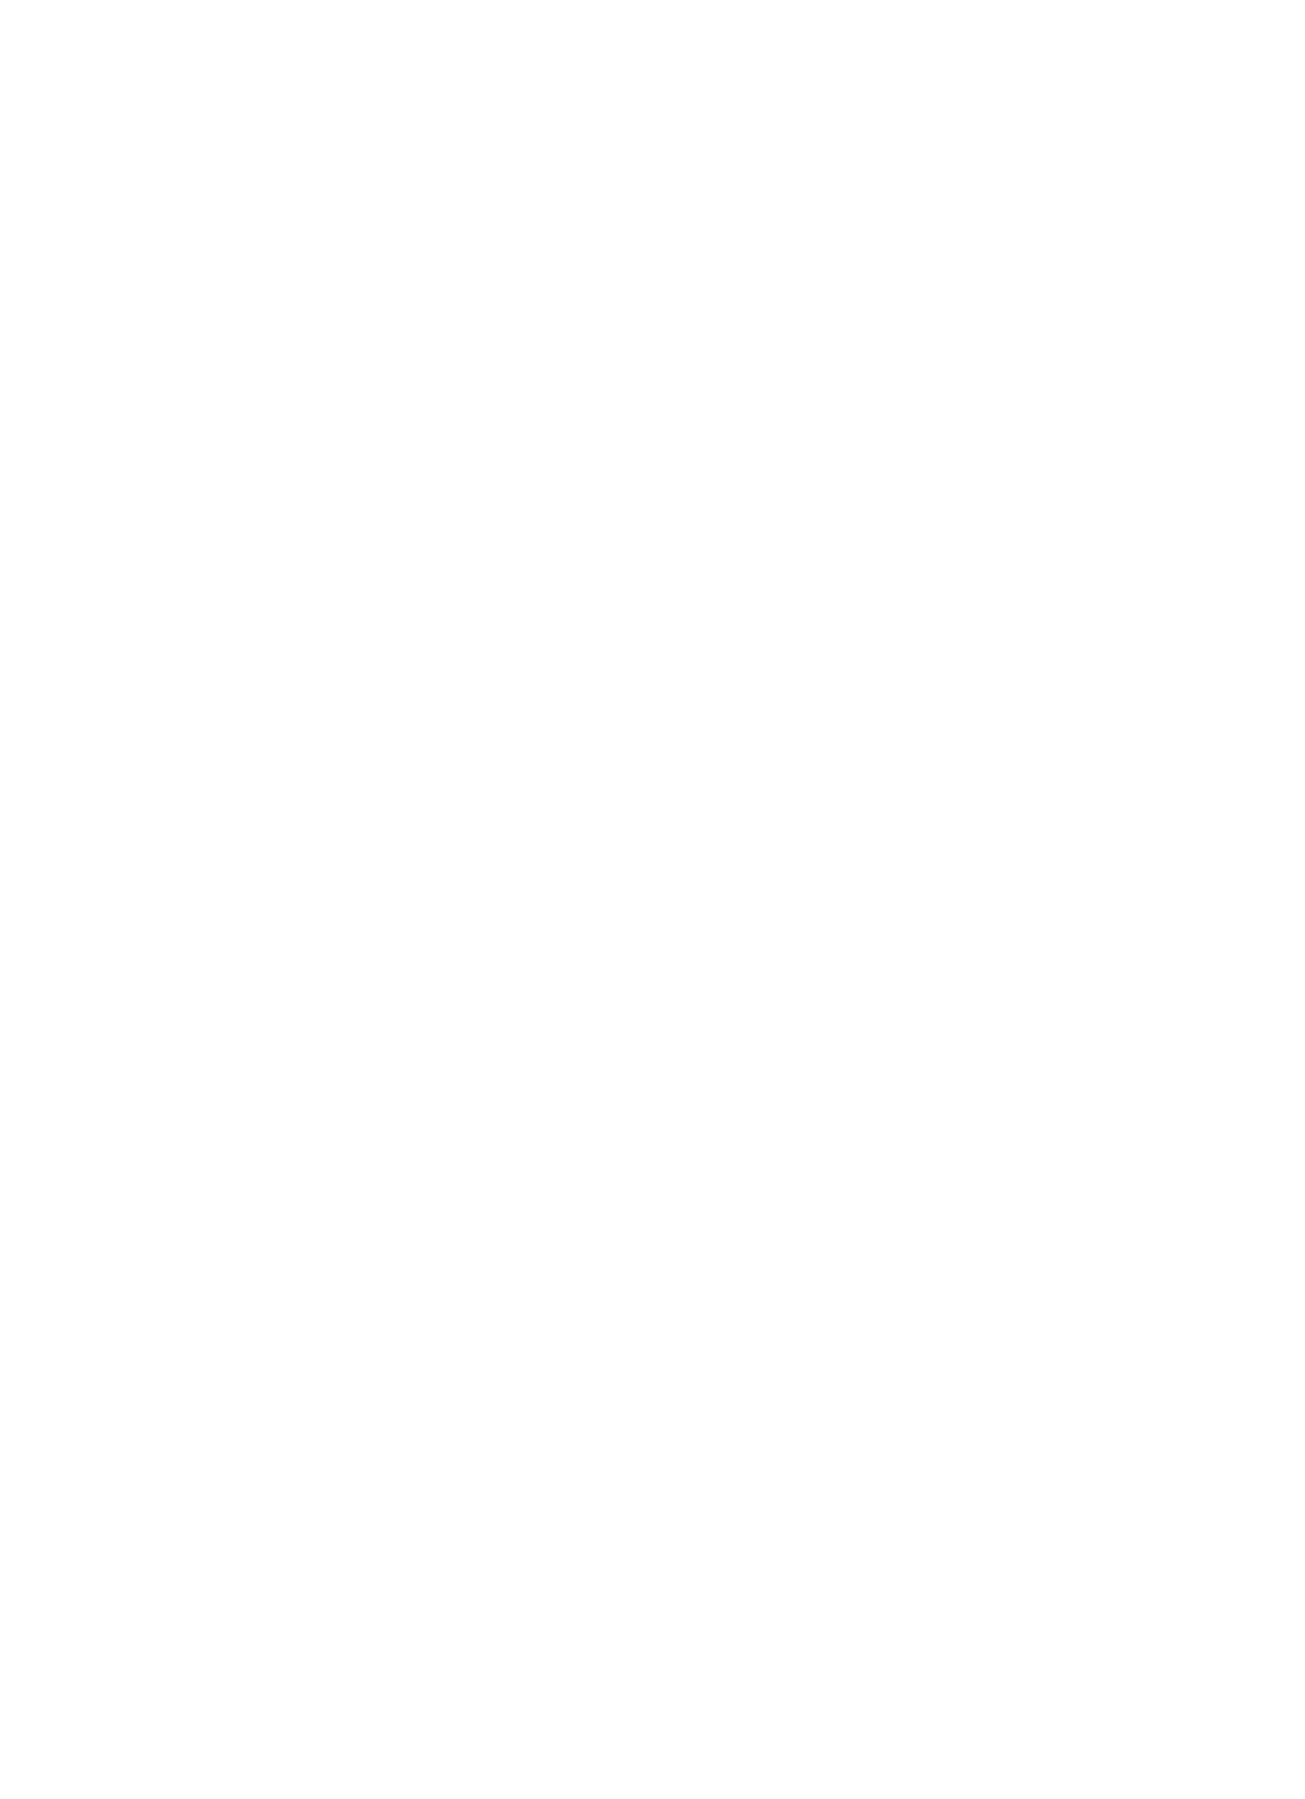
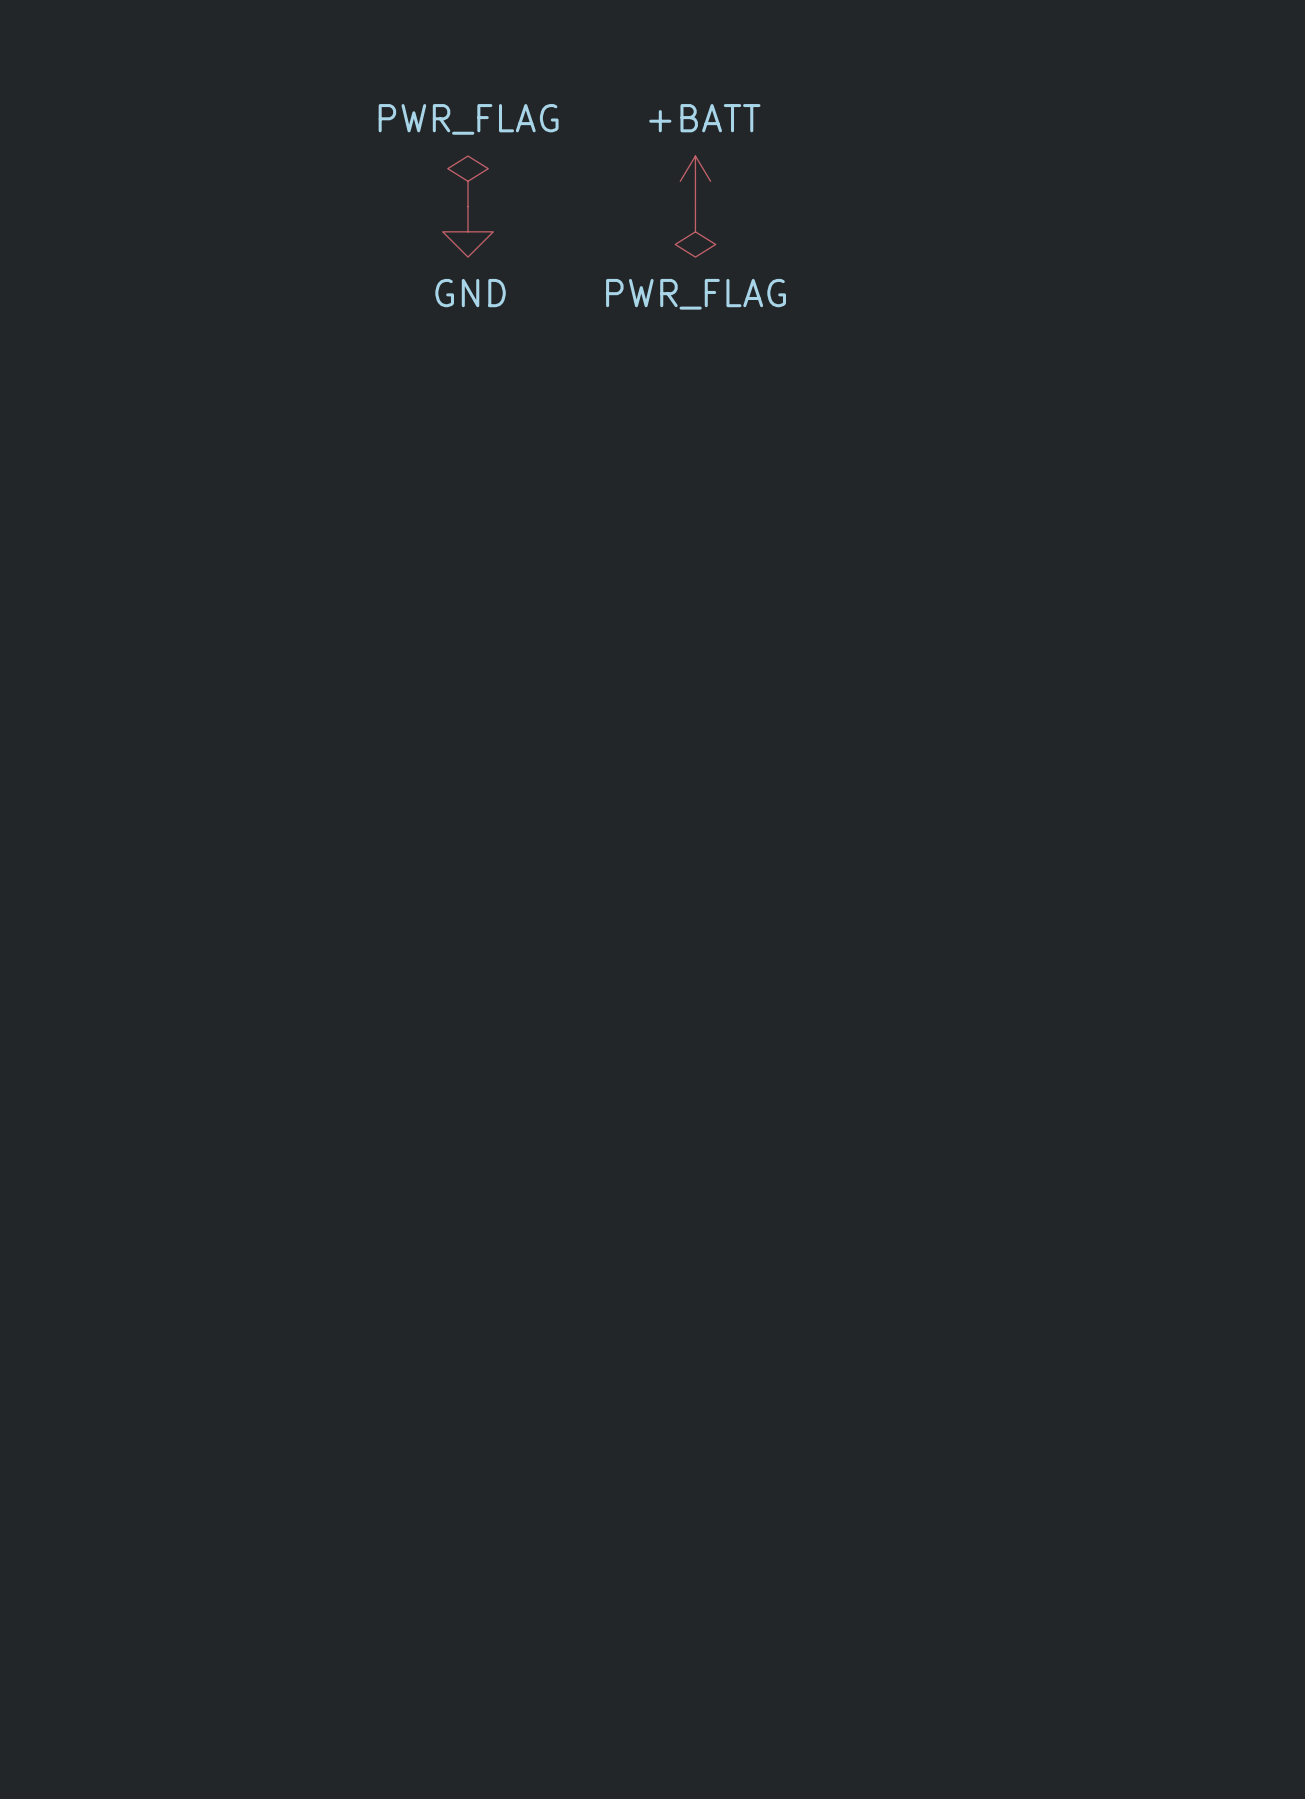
power symbol: none -> PWR_FLAG (468, 181)
power symbol: none -> +BATT (695, 181)
power symbol: none -> GND (468, 231)
power symbol: none -> PWR_FLAG (695, 231)

